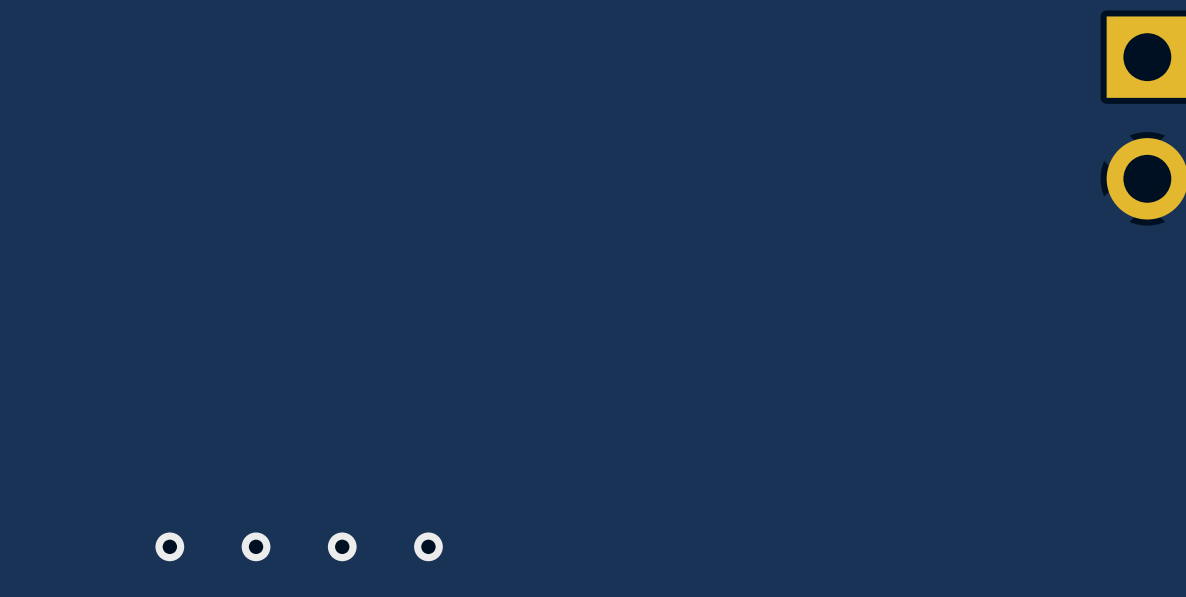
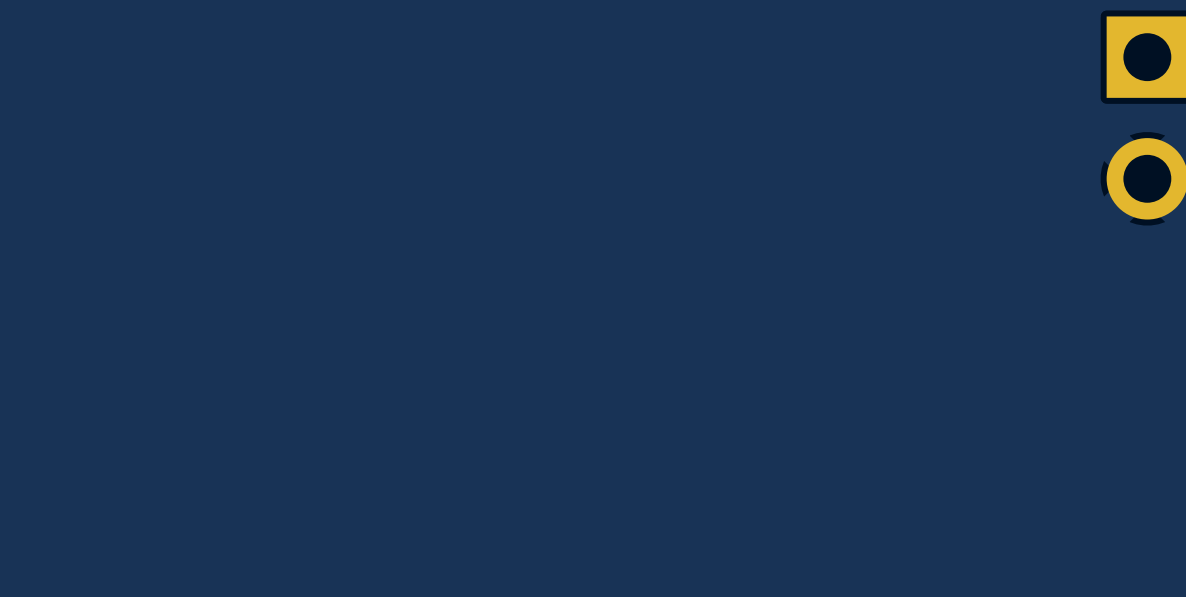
via: (169, 546) -> none
via: (256, 546) -> none
via: (342, 546) -> none
via: (428, 546) -> none

